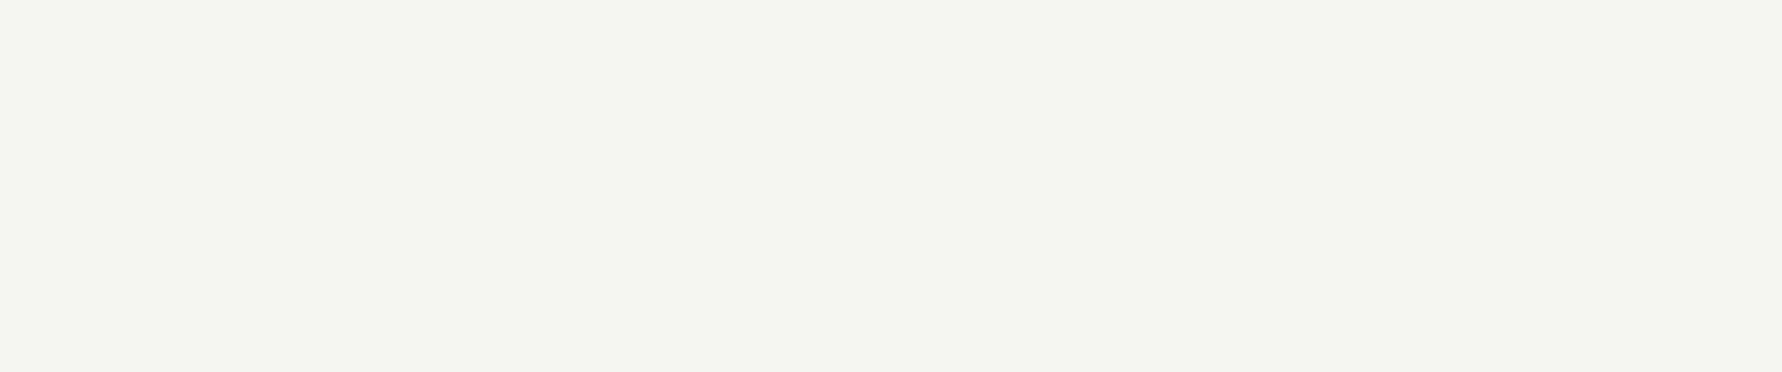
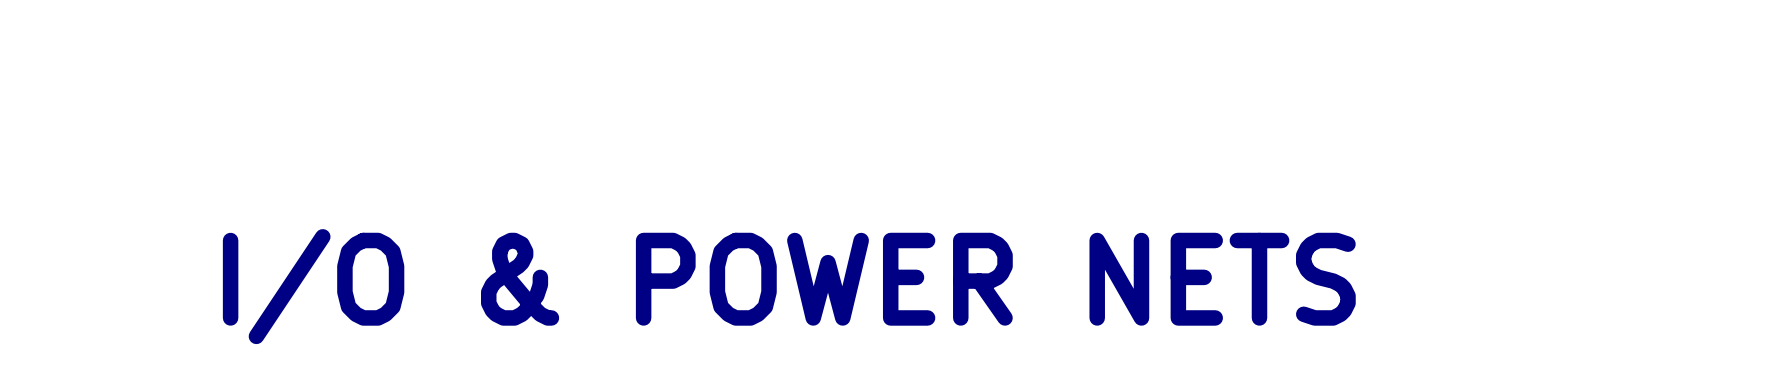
text: none -> I/O & POWER NETS (789, 286)

